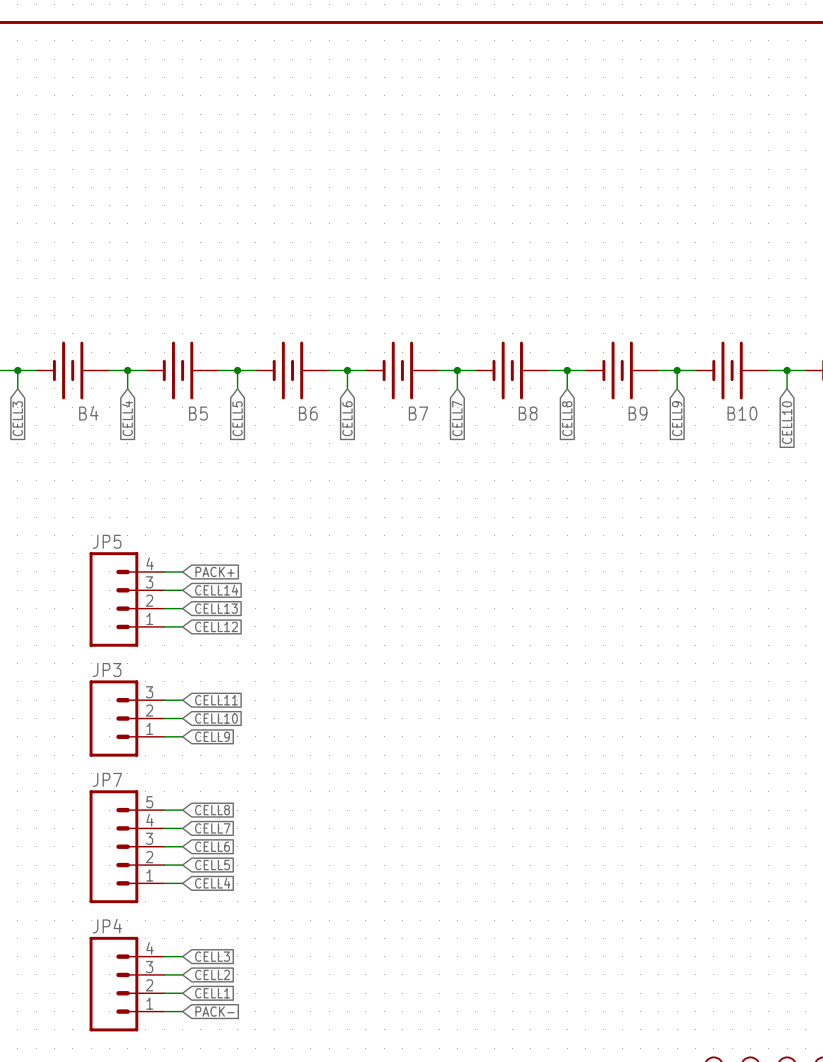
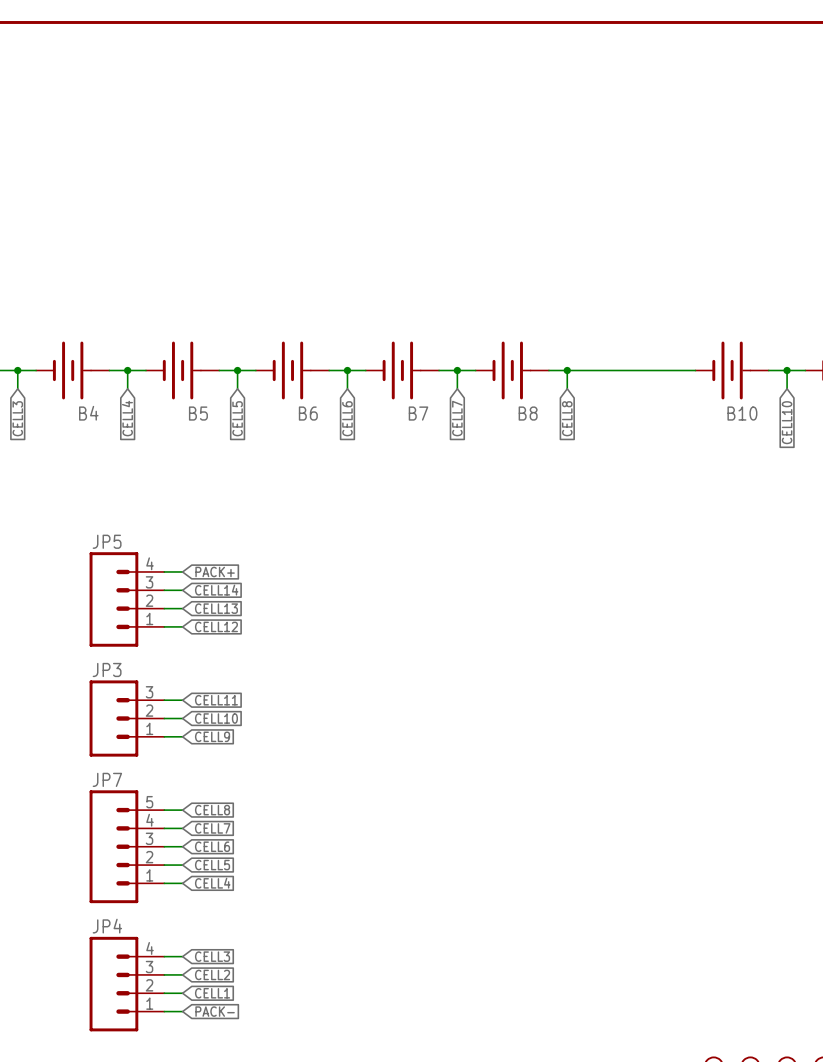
B9: (622, 370) -> none
wire: (677, 370) (677, 388) -> none
junction: (677, 370) -> none
global label: CELL9 (677, 418) -> none

